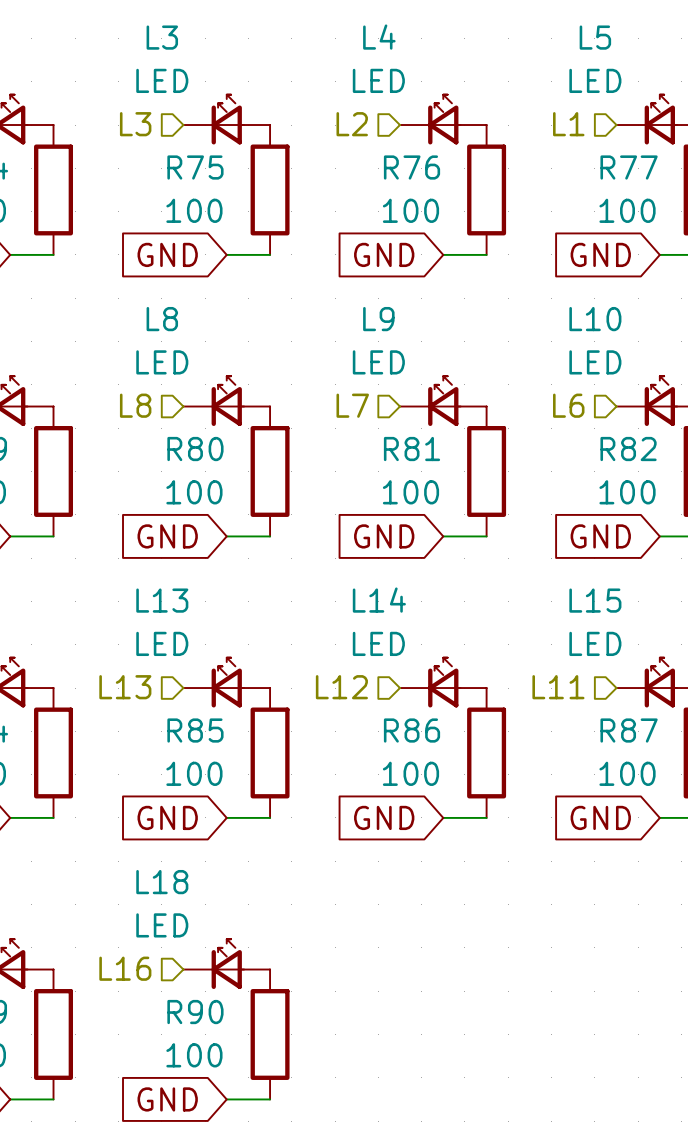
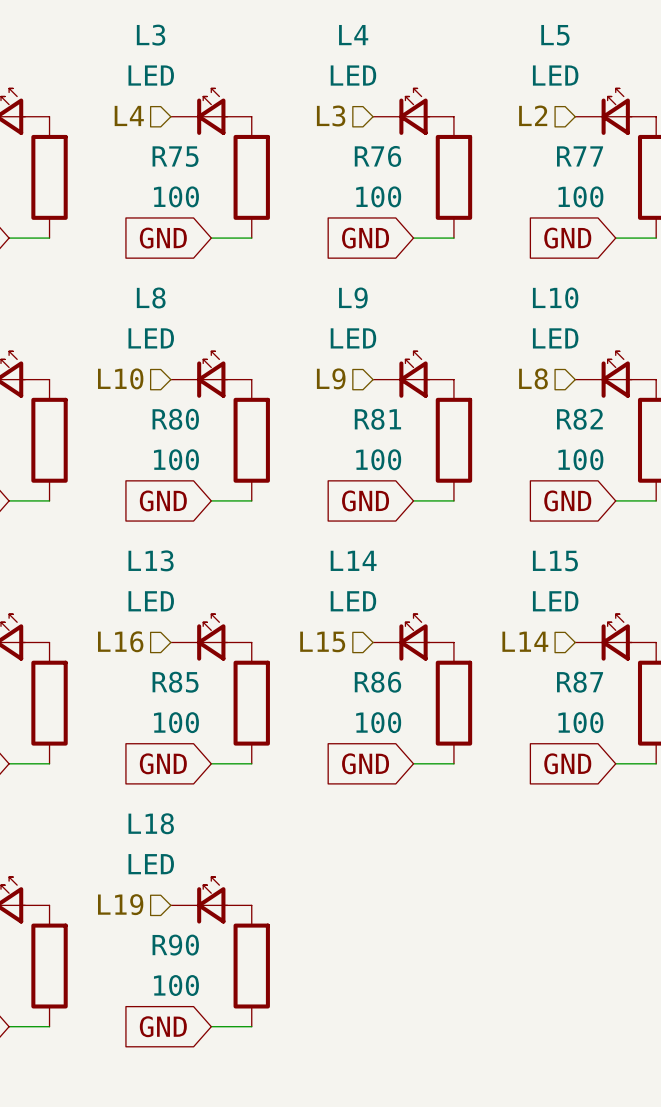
hierarchical label: L3 (135, 124) -> L4 (129, 115)
hierarchical label: L2 (352, 124) -> L3 (331, 115)
hierarchical label: L1 (568, 124) -> L2 (533, 115)
hierarchical label: L8 (135, 405) -> L10 (120, 378)
hierarchical label: L7 (352, 405) -> L9 (331, 378)
hierarchical label: L6 (568, 405) -> L8 (533, 378)
hierarchical label: L13 (125, 687) -> L16 (120, 641)
hierarchical label: L12 (341, 687) -> L15 (322, 641)
hierarchical label: L11 (558, 687) -> L14 (525, 641)
hierarchical label: L16 (125, 968) -> L19 (120, 904)

